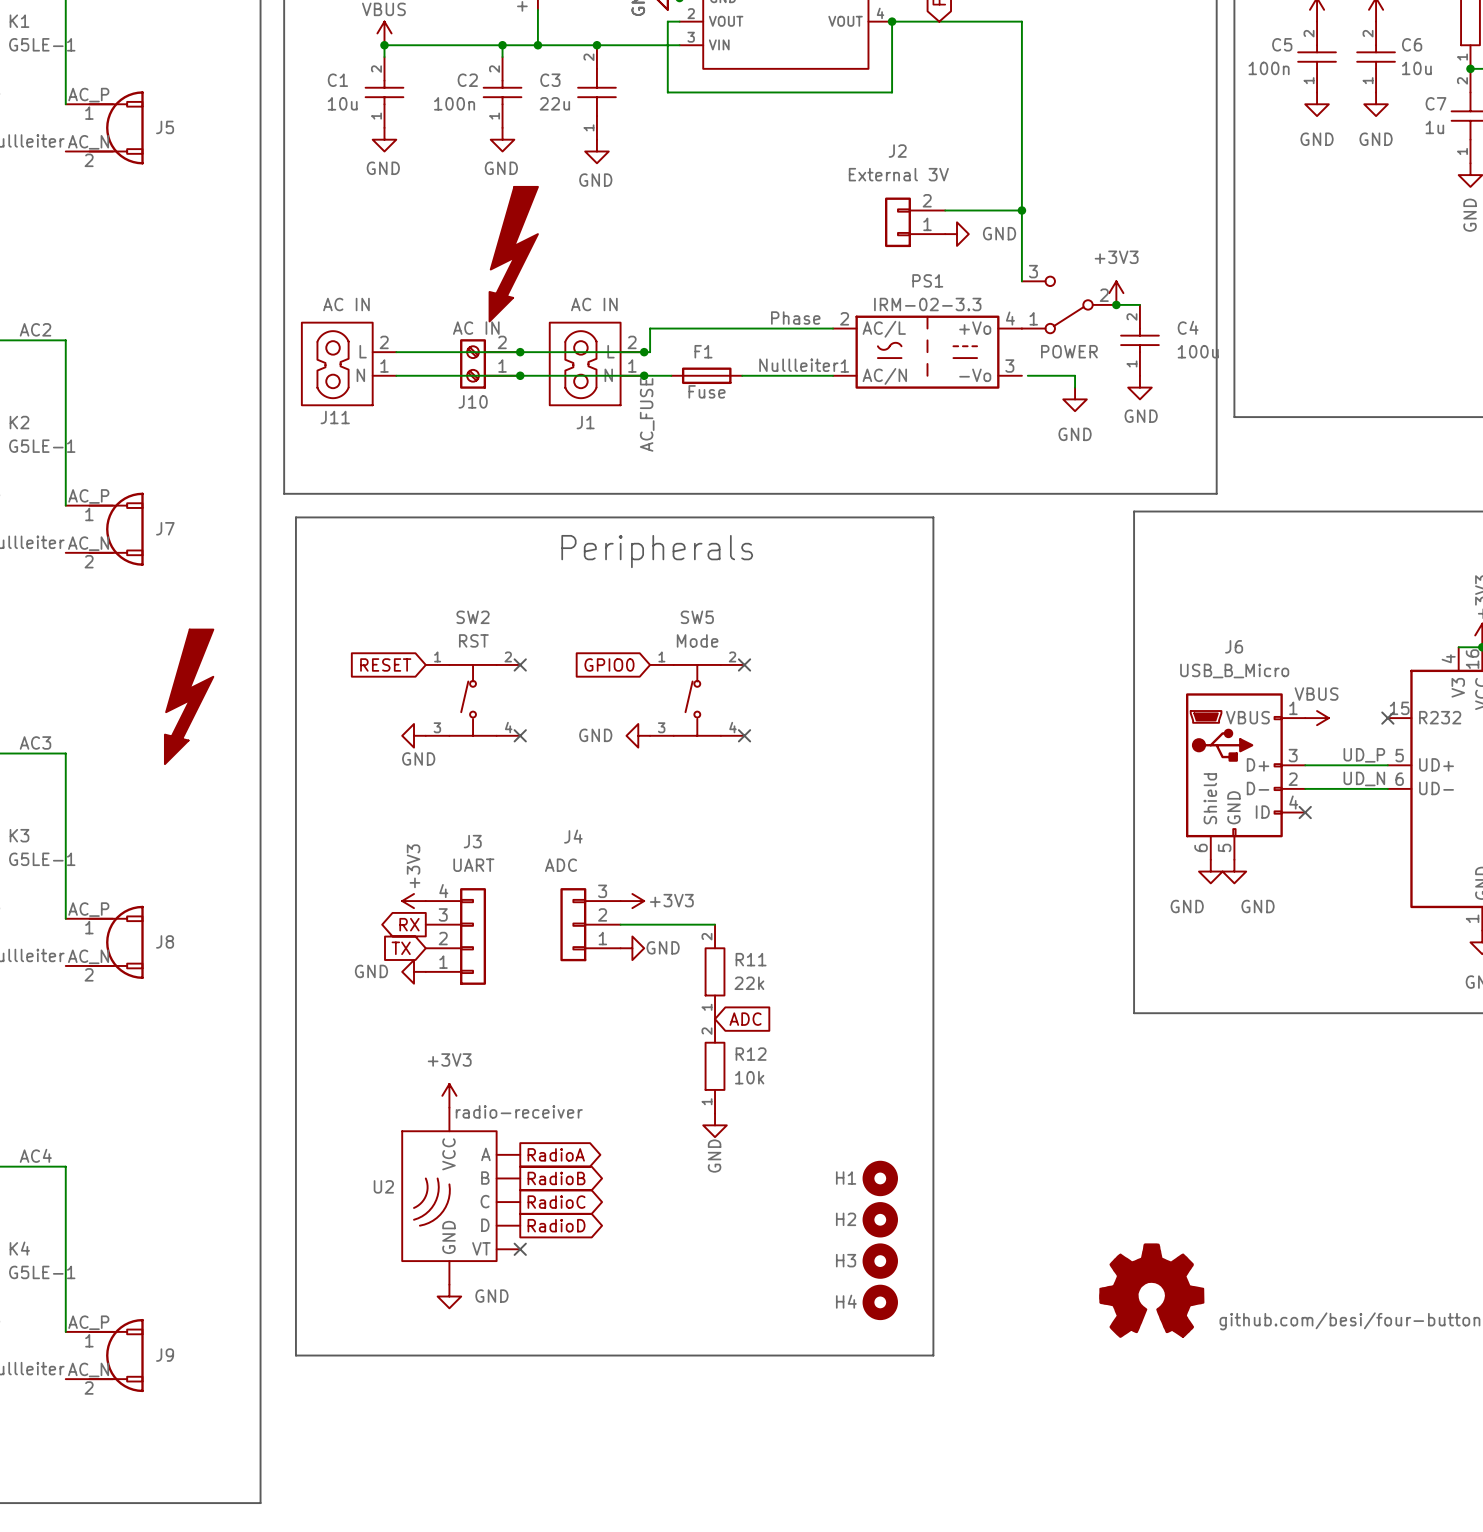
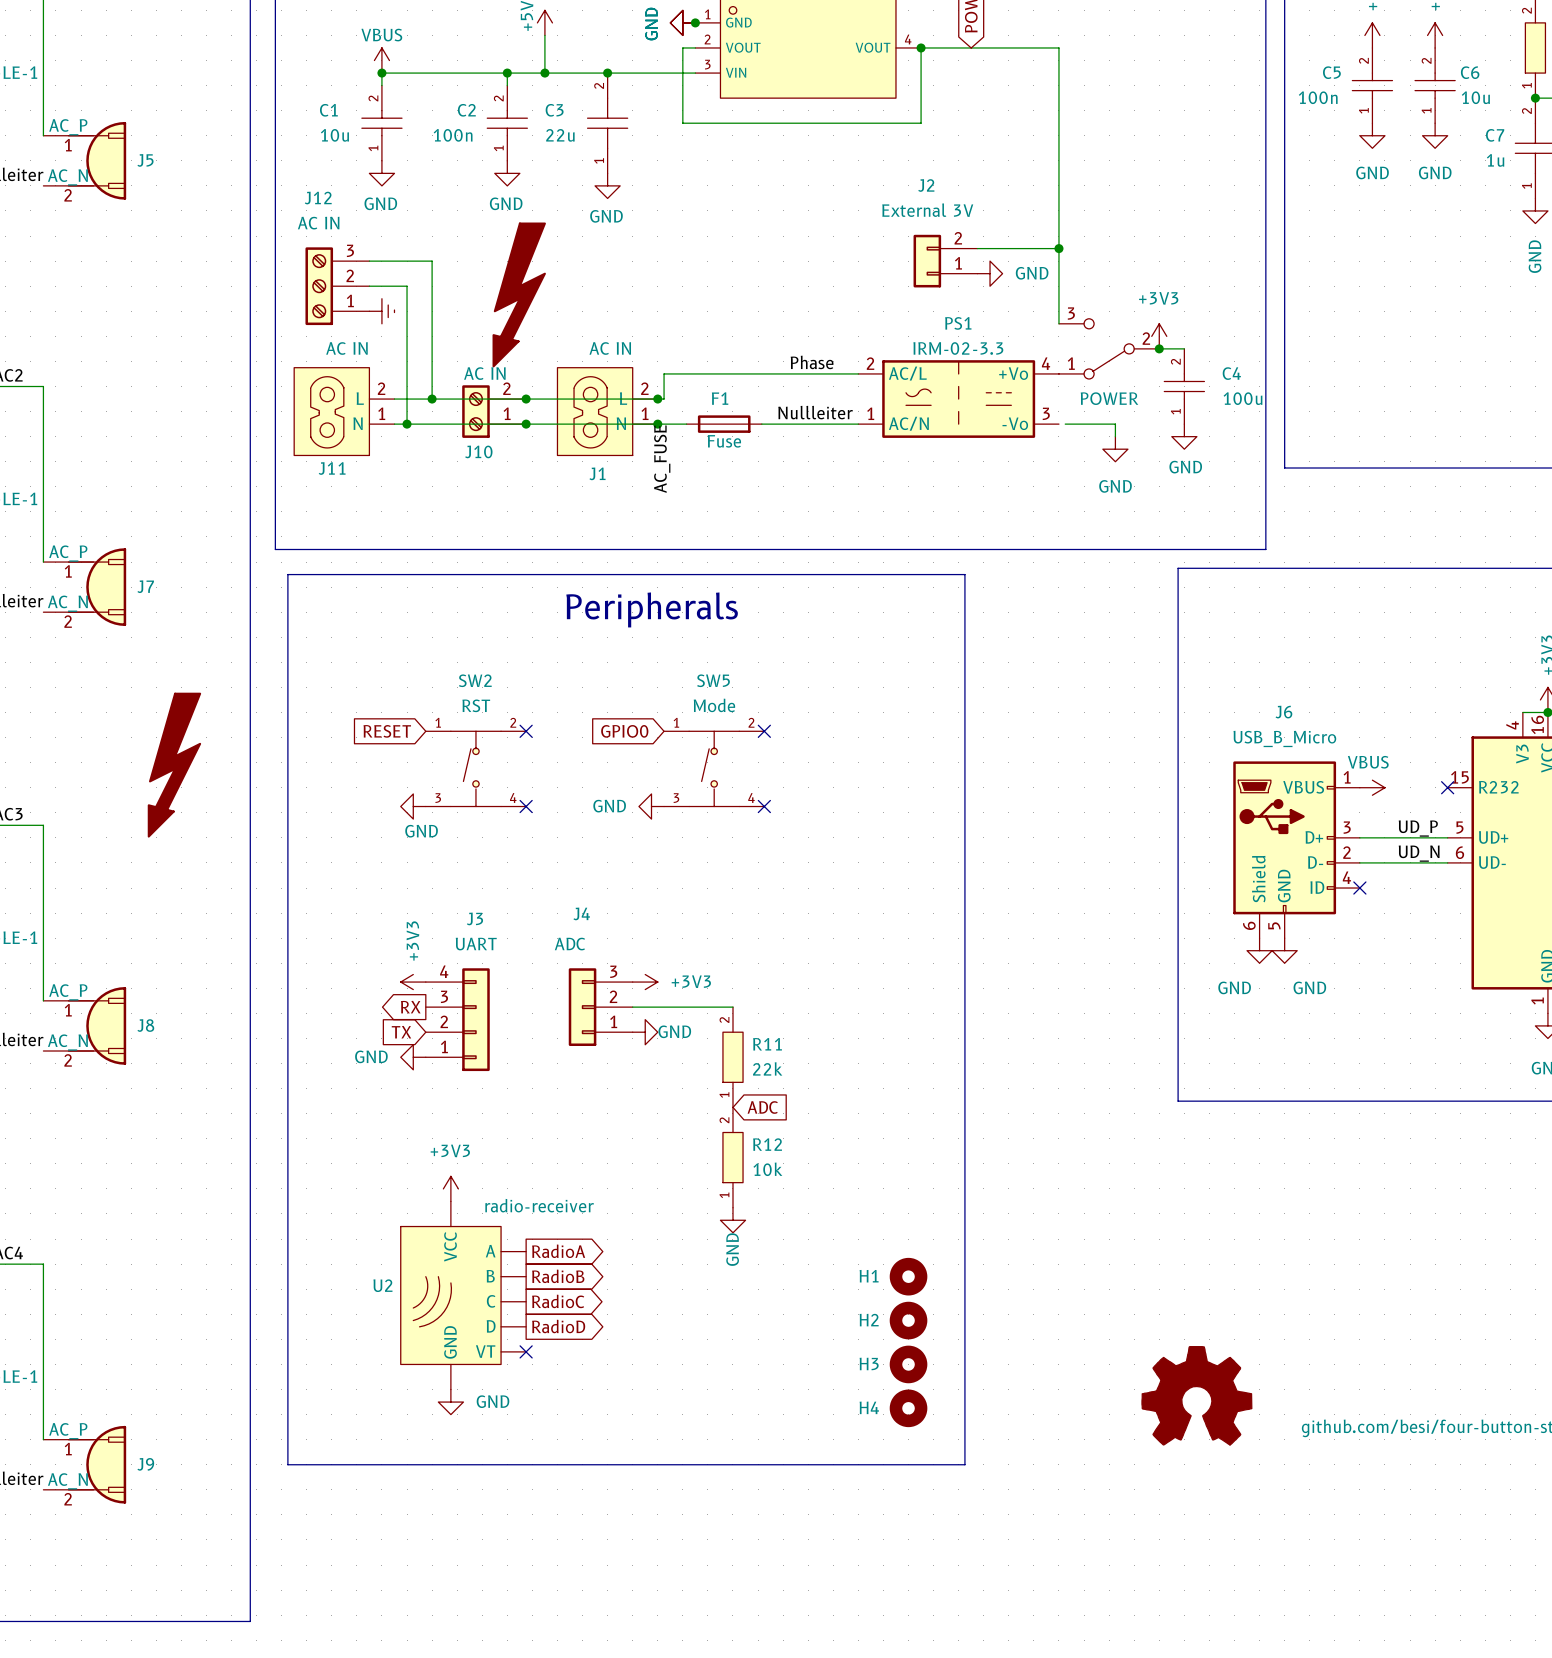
wire: none -> (369, 261) (432, 261) (432, 399)
J12: none -> AC IN (337, 286)
wire: none -> (369, 286) (407, 286) (407, 424)
power symbol: none -> (381, 311)
junction: none -> (432, 399)
junction: none -> (407, 424)

